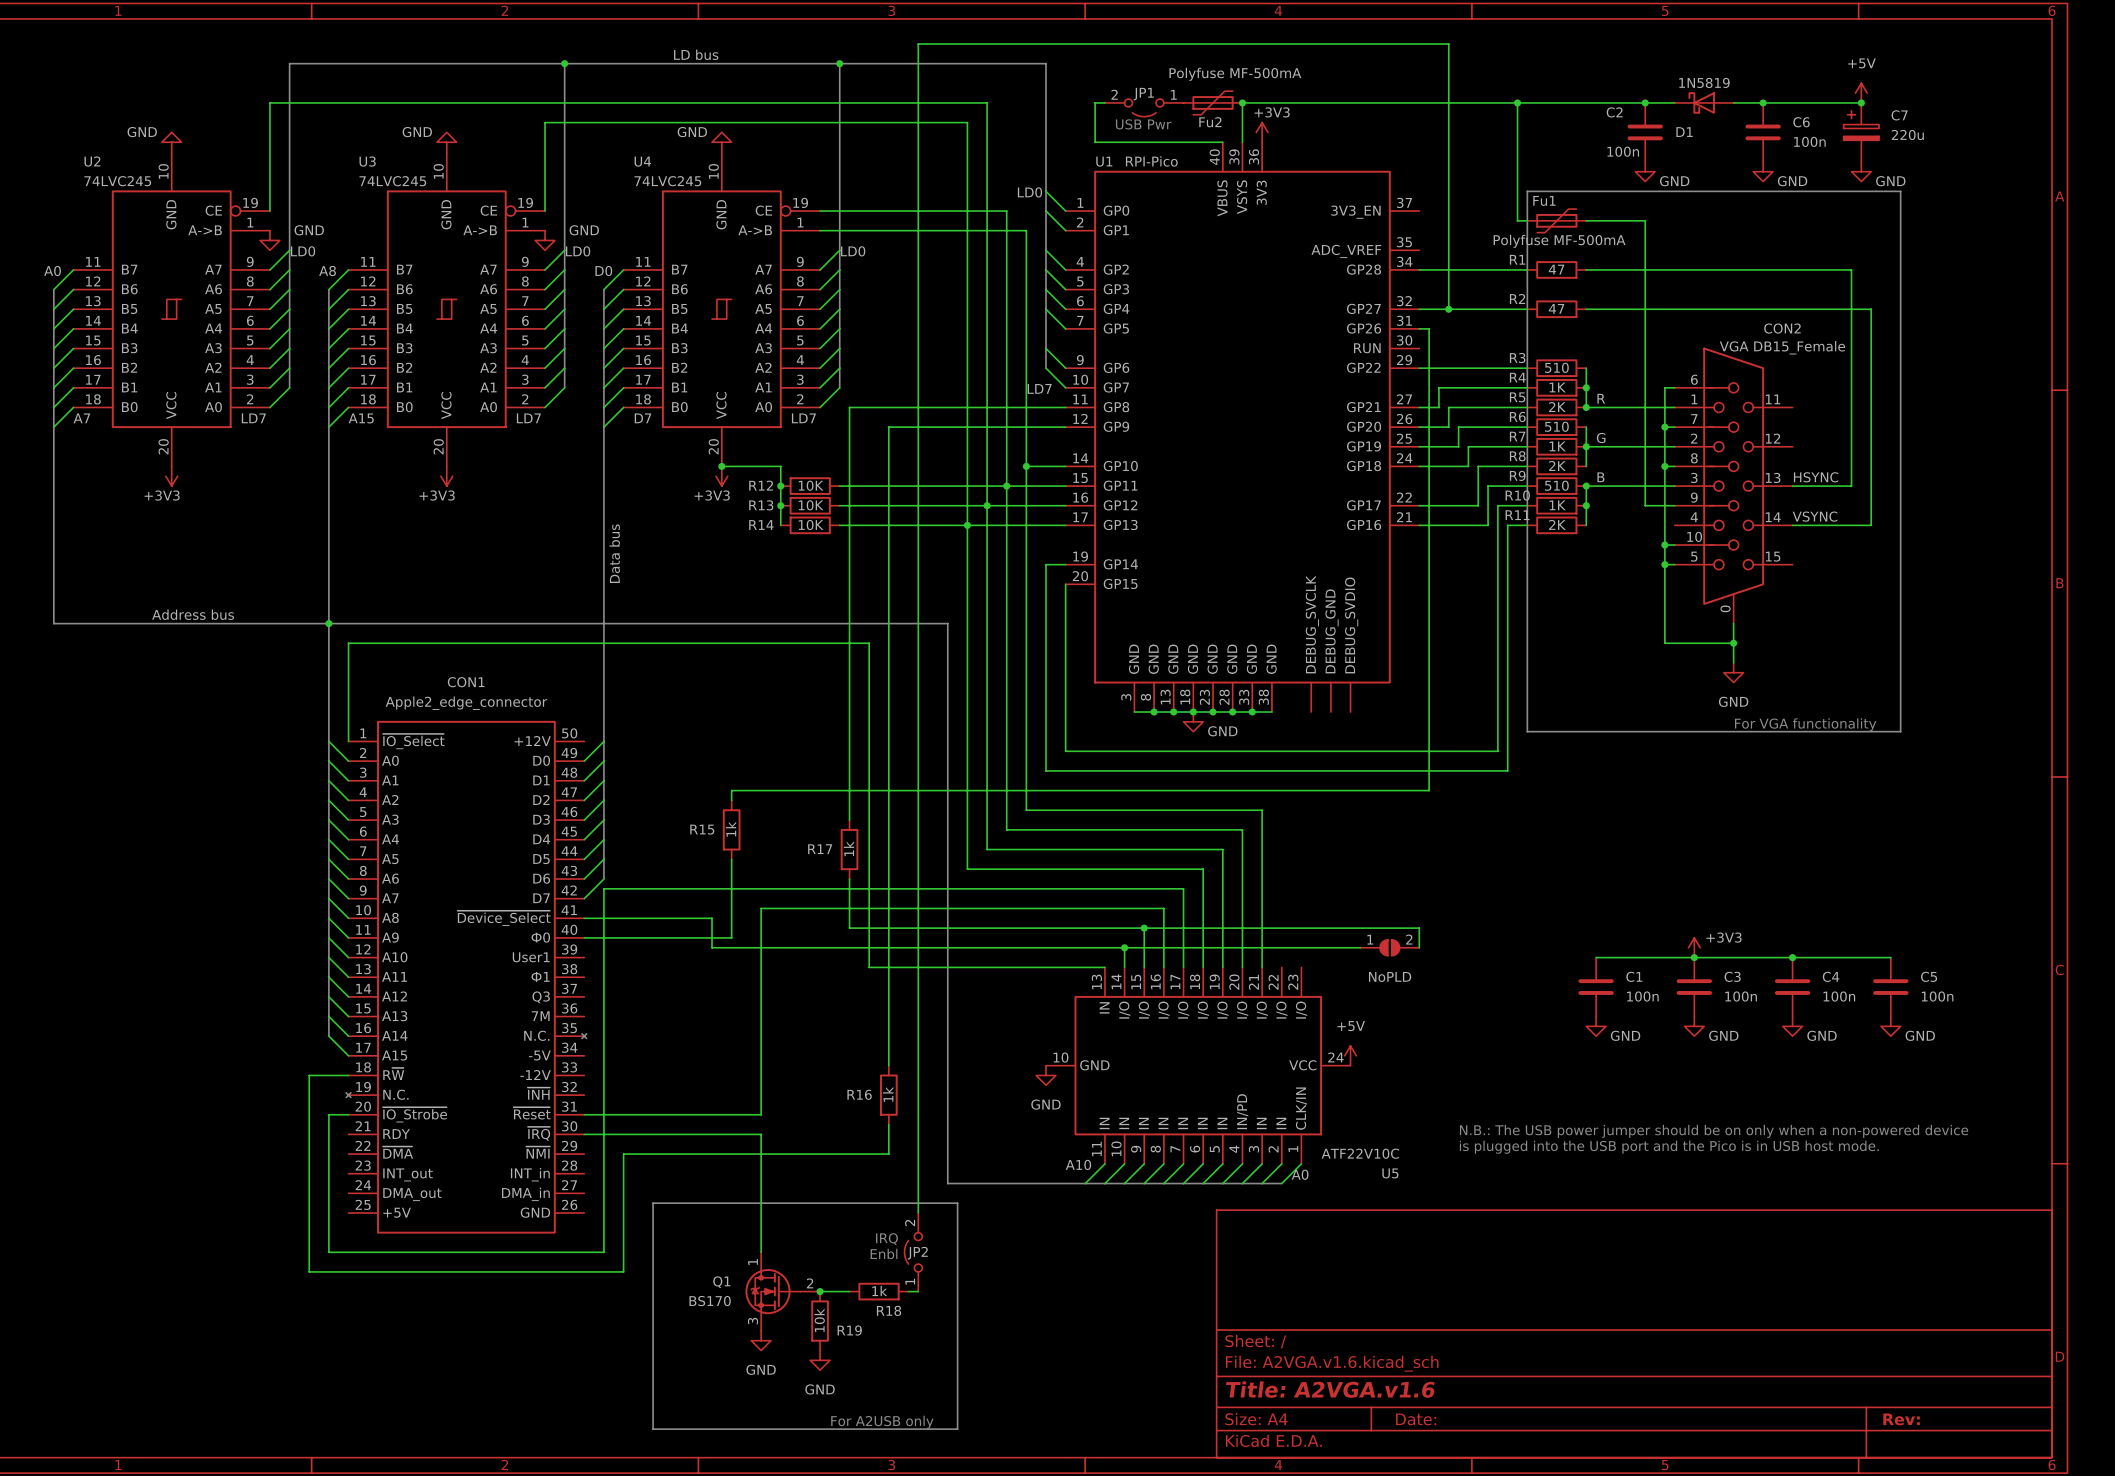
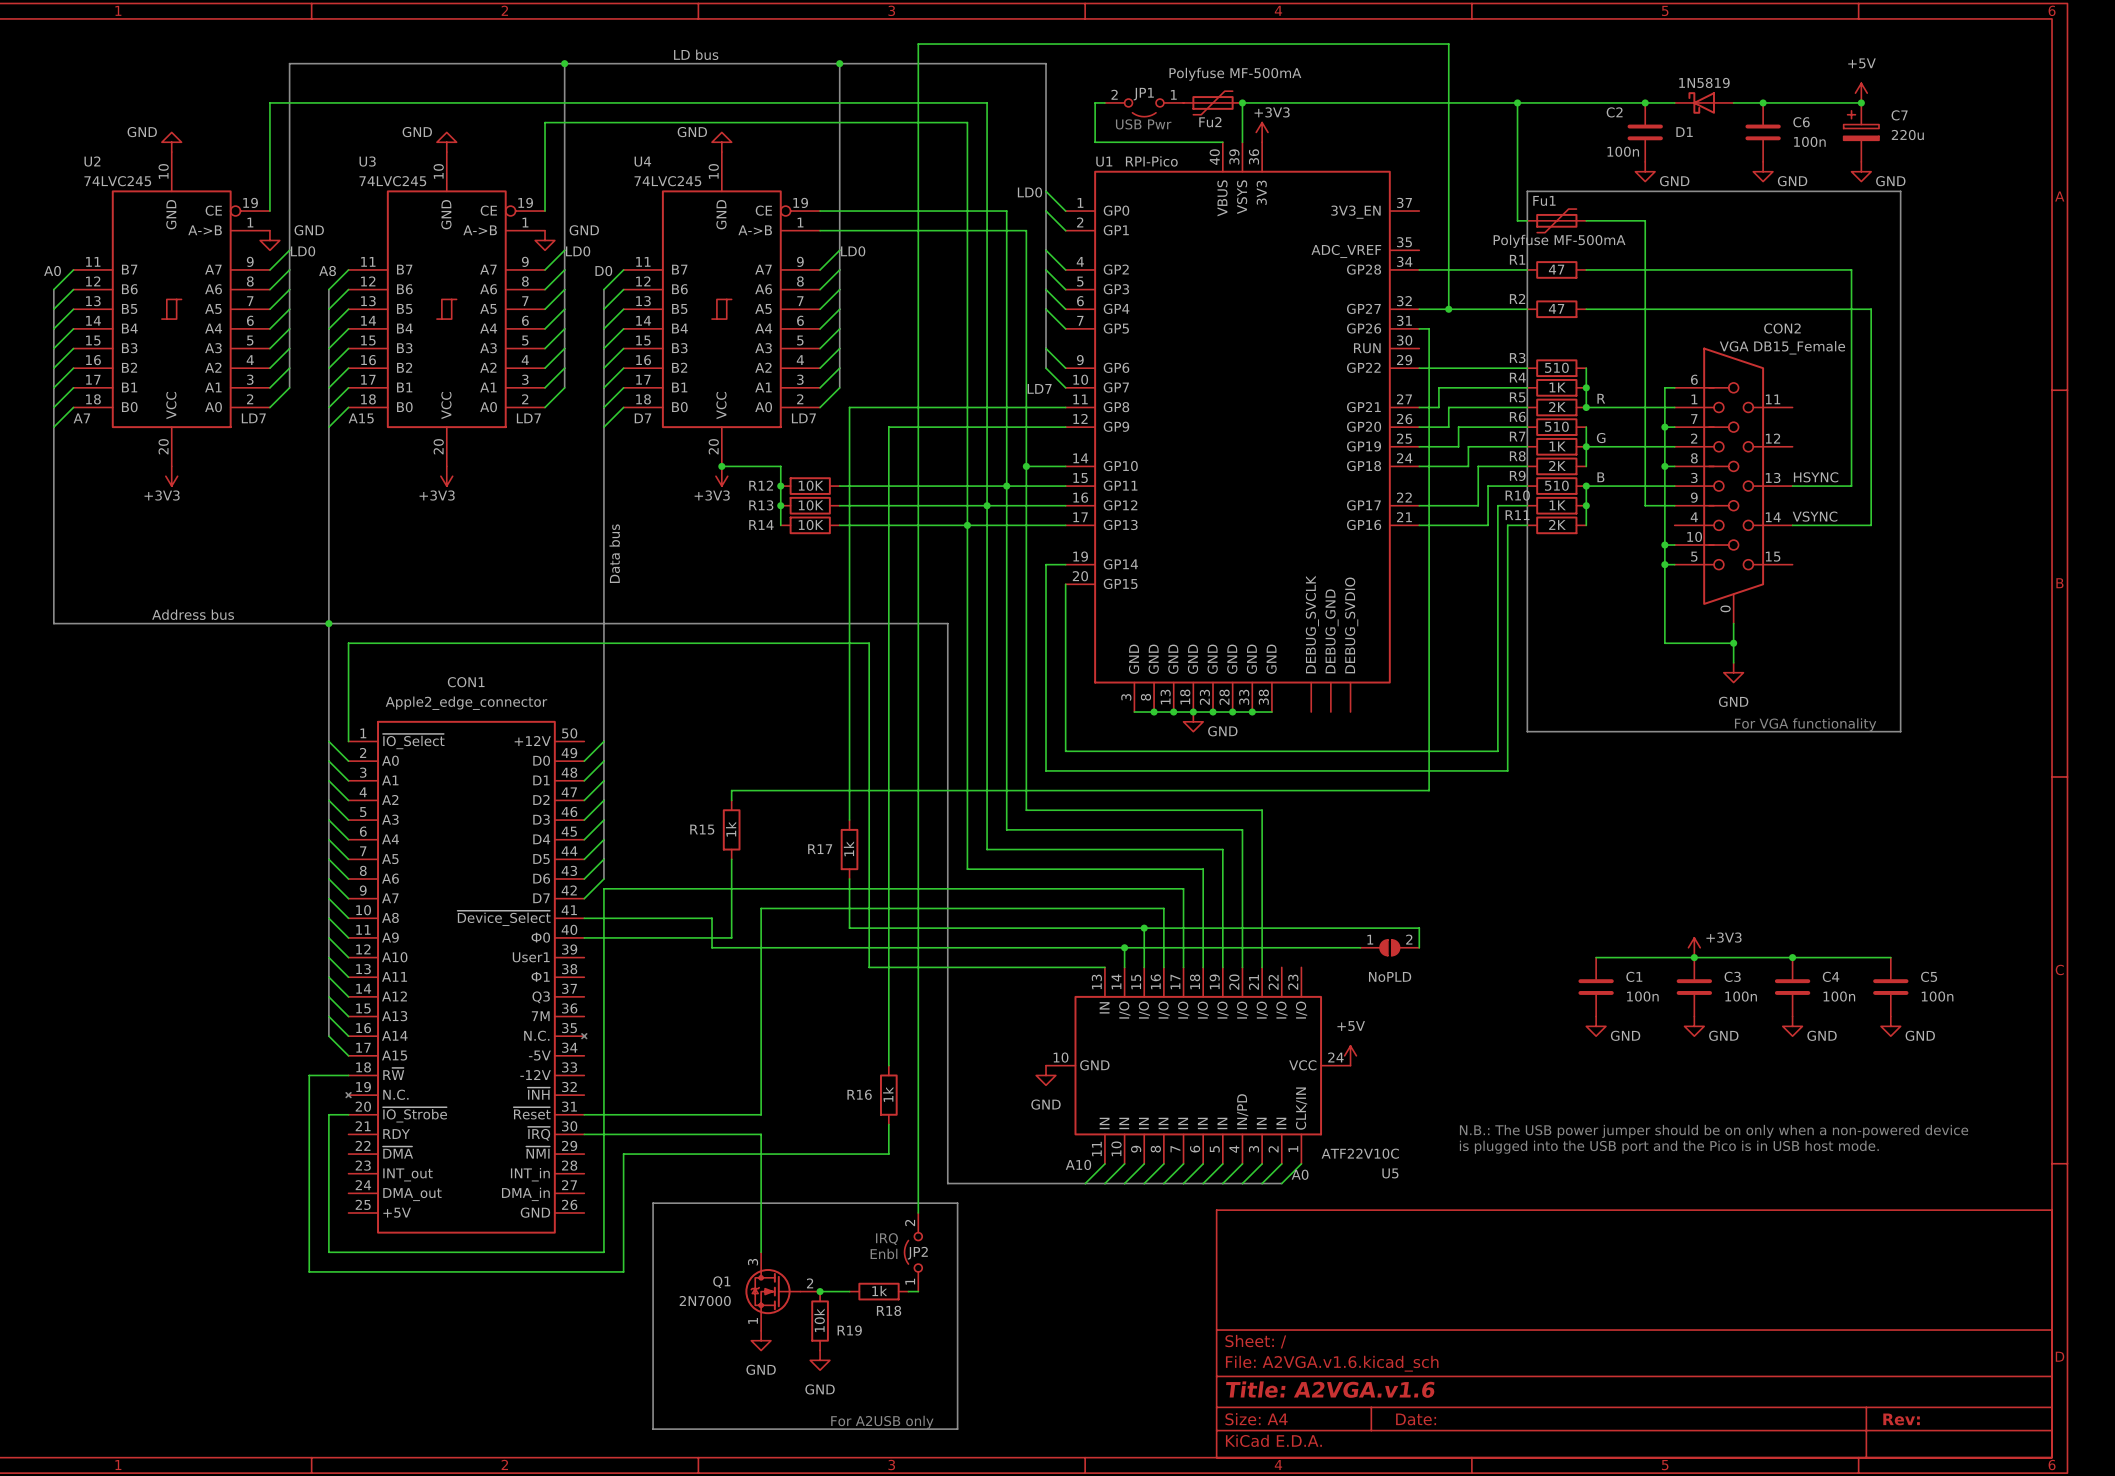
Q1 pin number: 1 (753, 1262) -> 3 (753, 1262)
Q1 value: BS170 (710, 1301) -> 2N7000 (705, 1301)
Q1 pin number: 3 (753, 1321) -> 1 (753, 1320)

